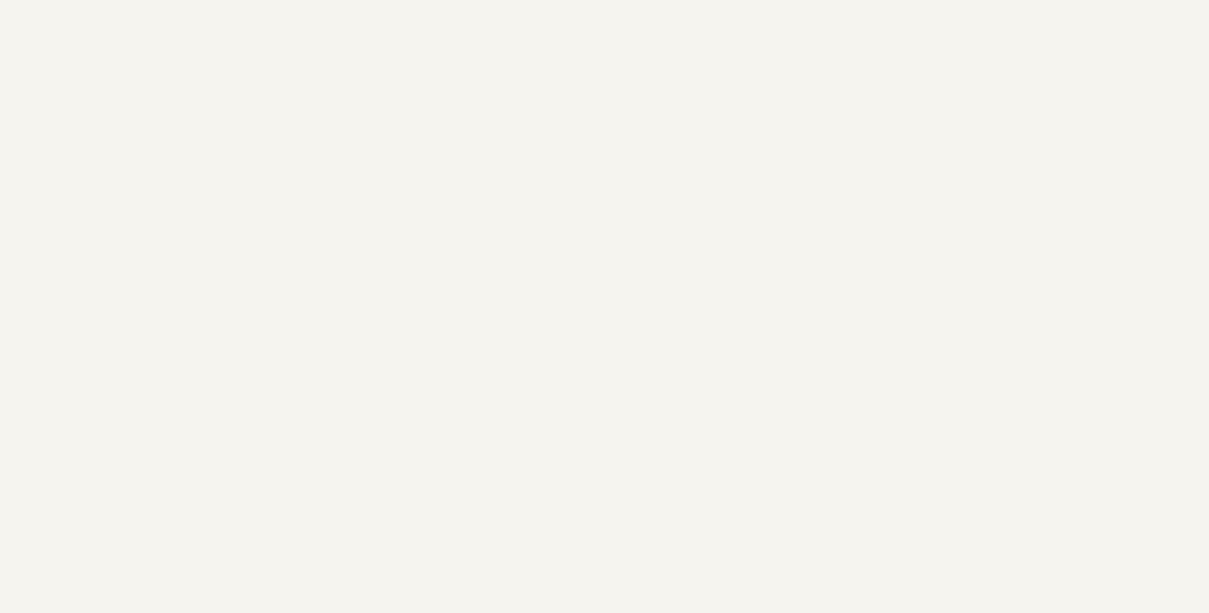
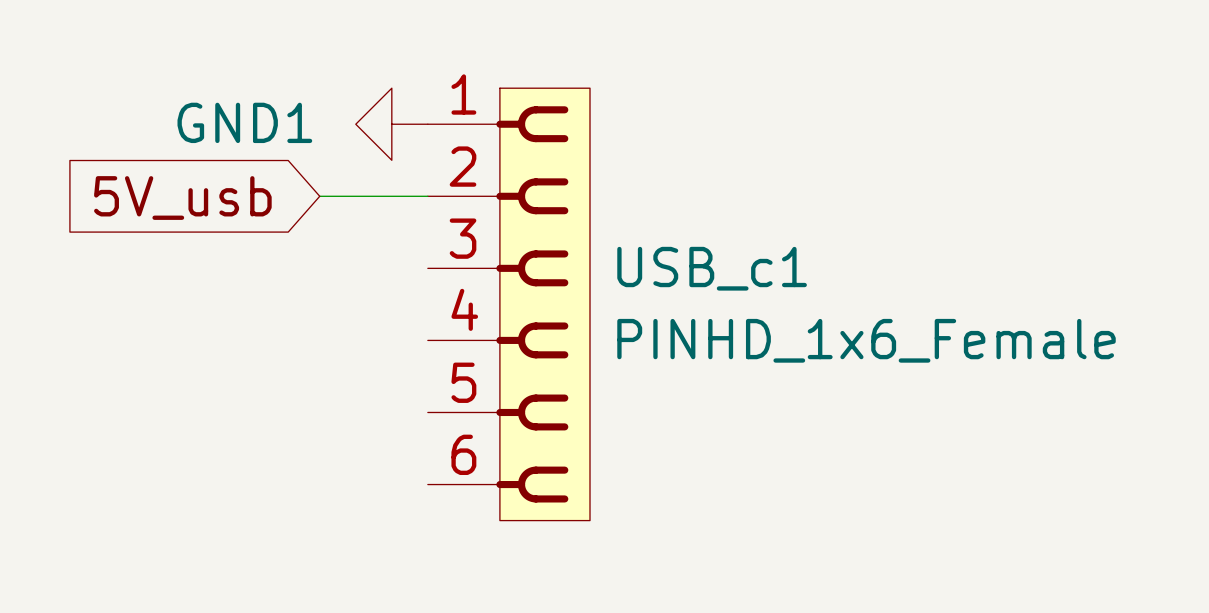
power symbol: none -> GND1 (391, 124)
wire: none -> (319, 196) (427, 196)
global label: none -> 5V_usb (182, 198)
USB_c1: none -> PINHD_1x6_Female (508, 304)

